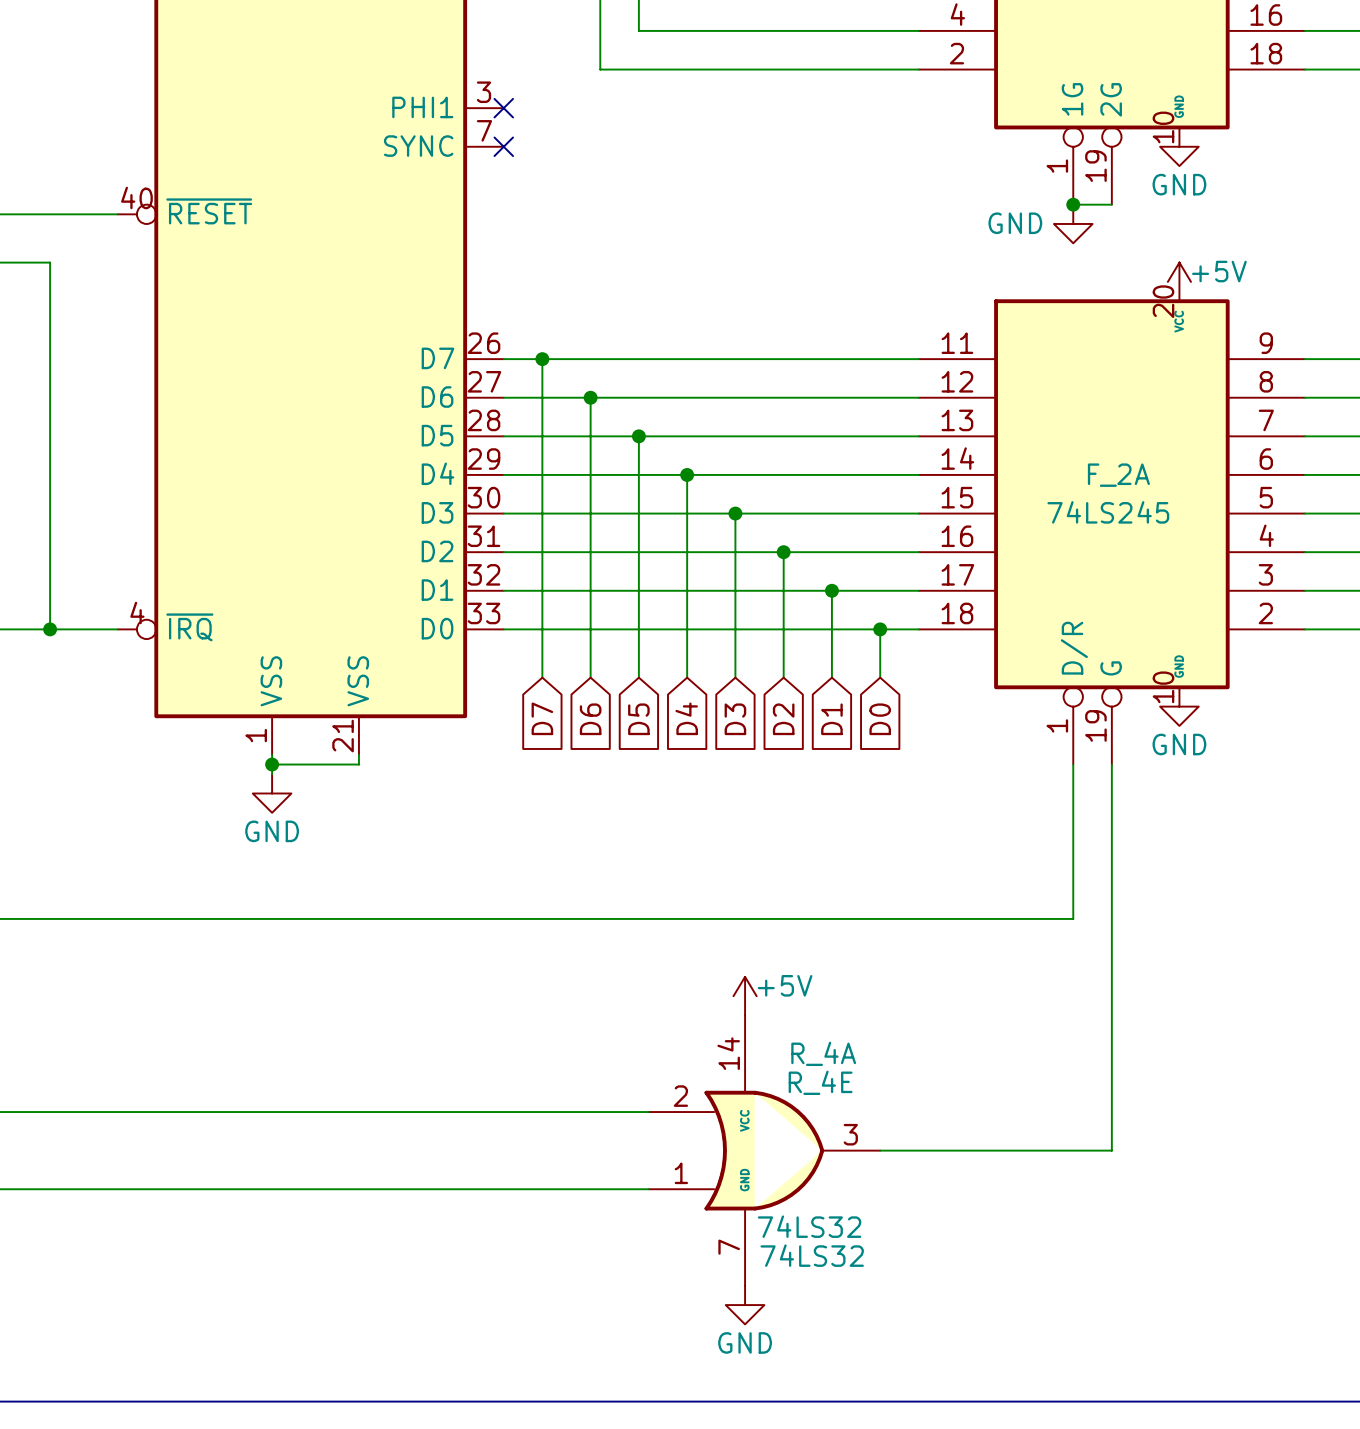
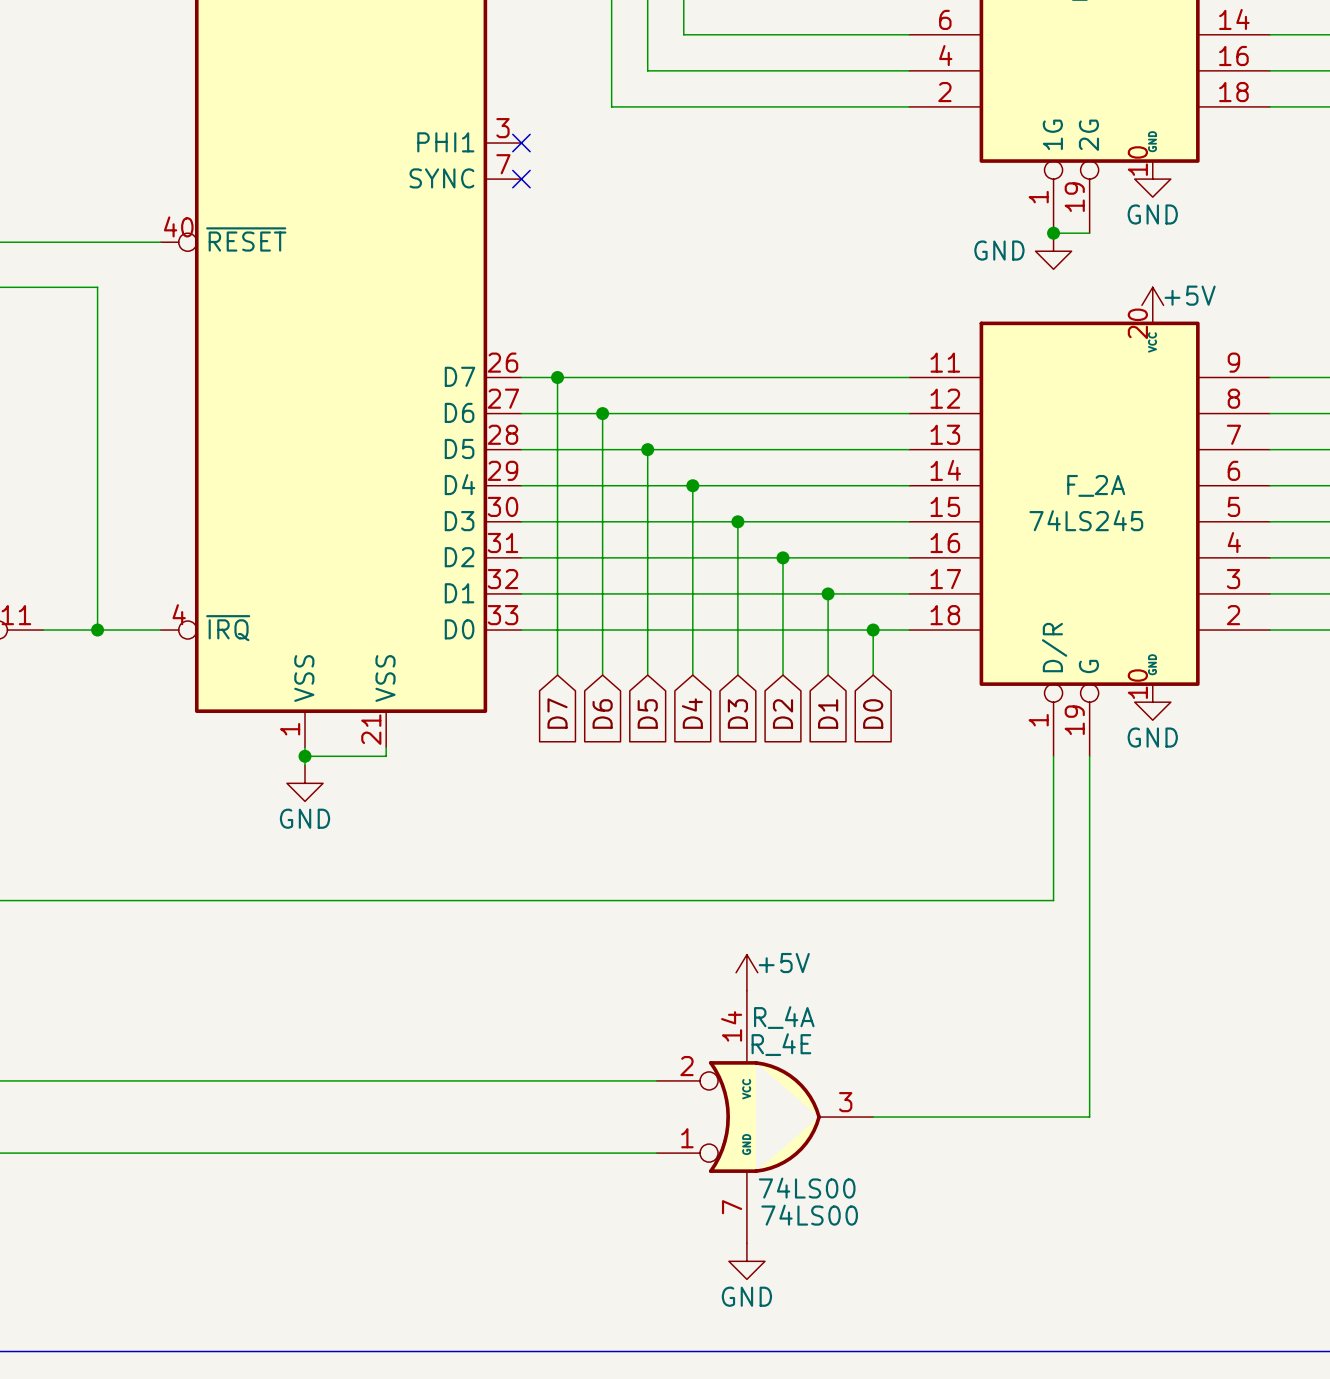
R_4A name position: R_4A (823, 1053) -> R_4A (784, 1017)
R_4E name position: R_4E (820, 1082) -> R_4E (781, 1044)
R_4A symbol: [648, 1090, 881, 1211] -> [656, 1061, 874, 1173]
R_4E value: 74LS32 (809, 1226) -> 74LS00 (807, 1188)
R_4A value: 74LS32 (812, 1255) -> 74LS00 (809, 1215)

